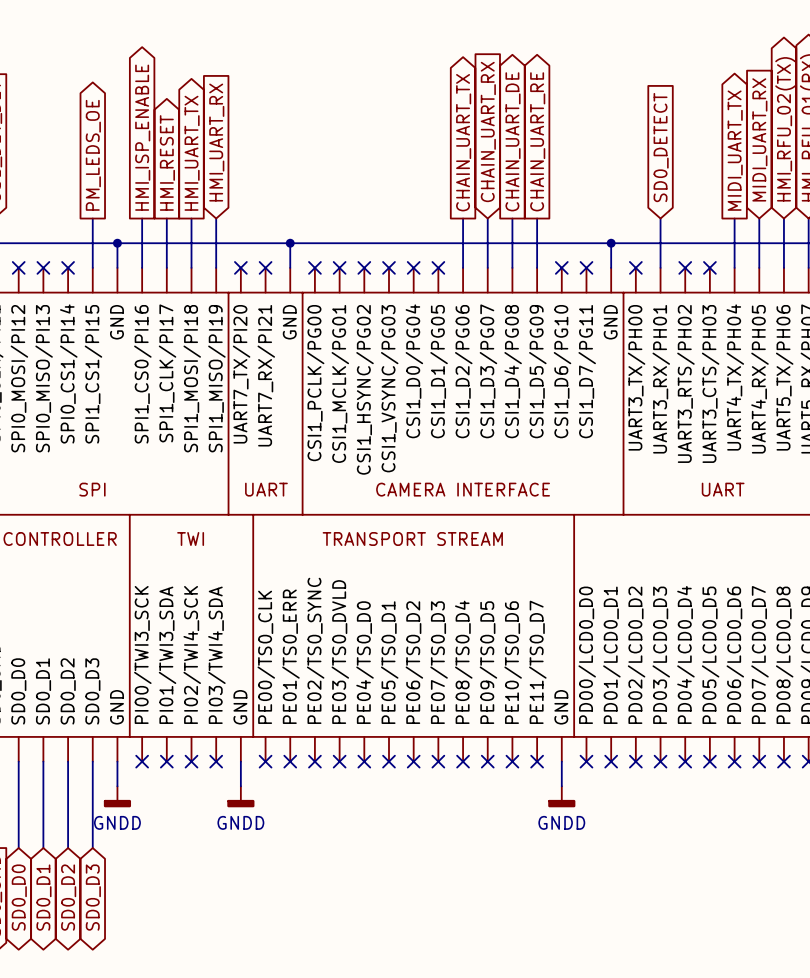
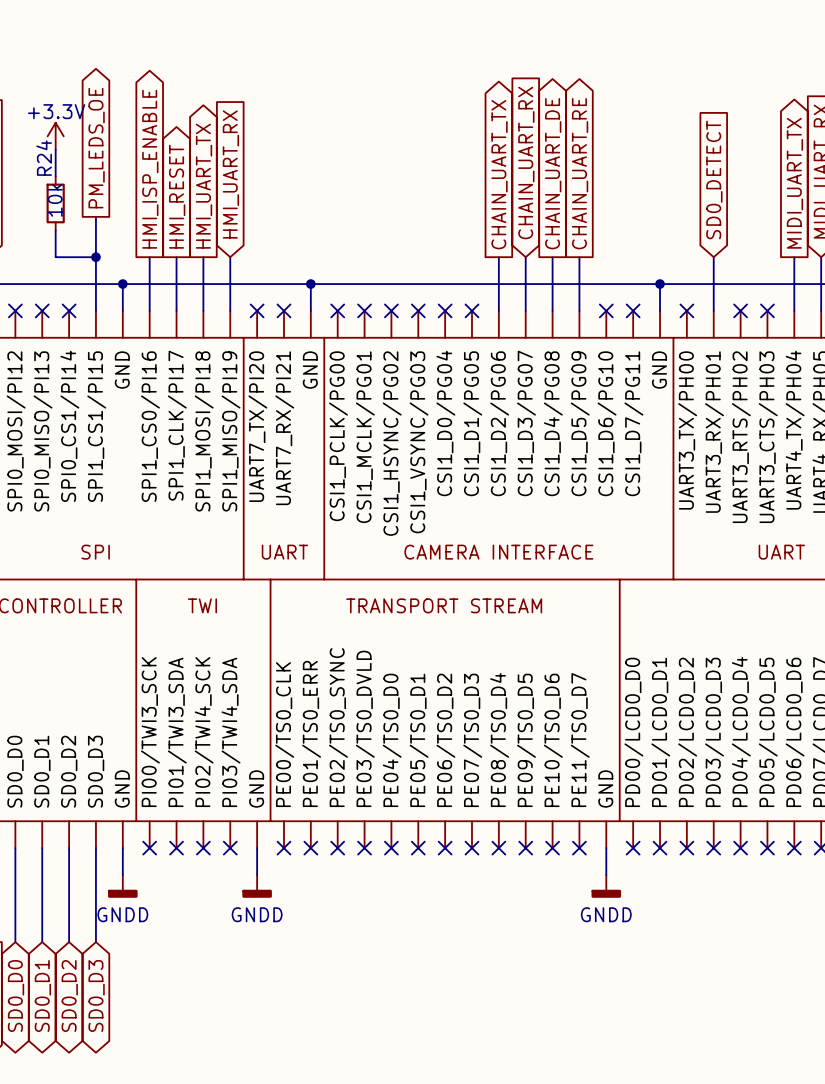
power symbol: none -> +3.3V (55, 136)
wire: none -> (55, 149) (55, 176)
global label position: PM_LEDS_OE (93, 155) -> PM_LEDS_OE (96, 148)
R24: none -> 10k (55, 203)
wire: none -> (95, 216) (95, 257) (55, 257) (55, 230)
junction: none -> (95, 257)

